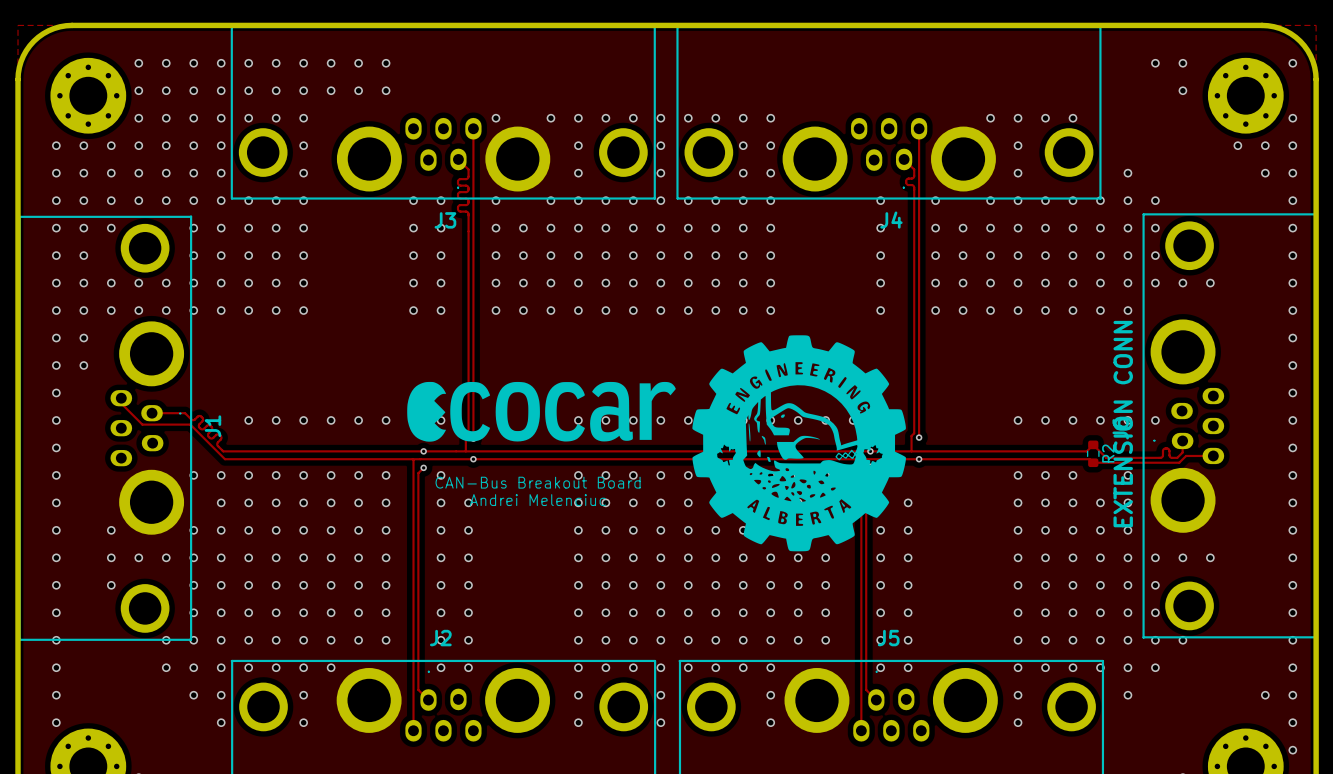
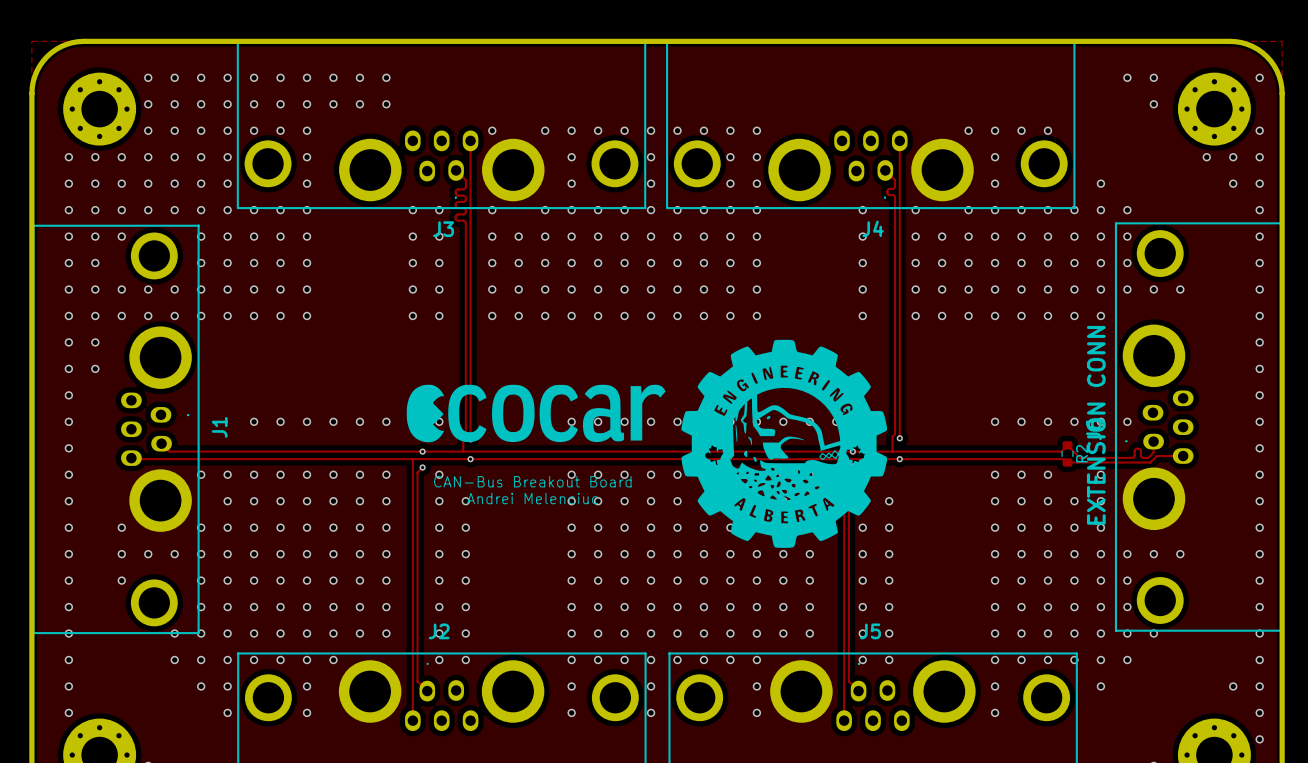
track: (121, 403) (142, 424) (190, 424) (224, 459) -> (131, 458) (231, 459)
track: (152, 413) (185, 413) (193, 420) (200, 416) (203, 419) (199, 427) (202, 429) (207, 425) (210, 425) (212, 429) (208, 435) (210, 438) (217, 434) (220, 435) (221, 438) (217, 444) (223, 451) -> (161, 443) (169, 451) (229, 451)

